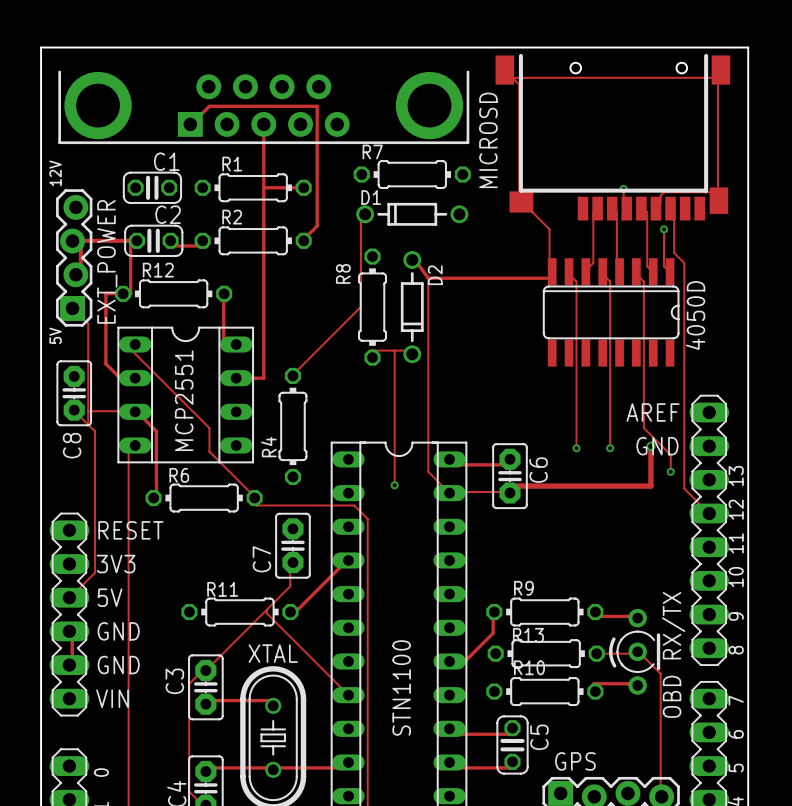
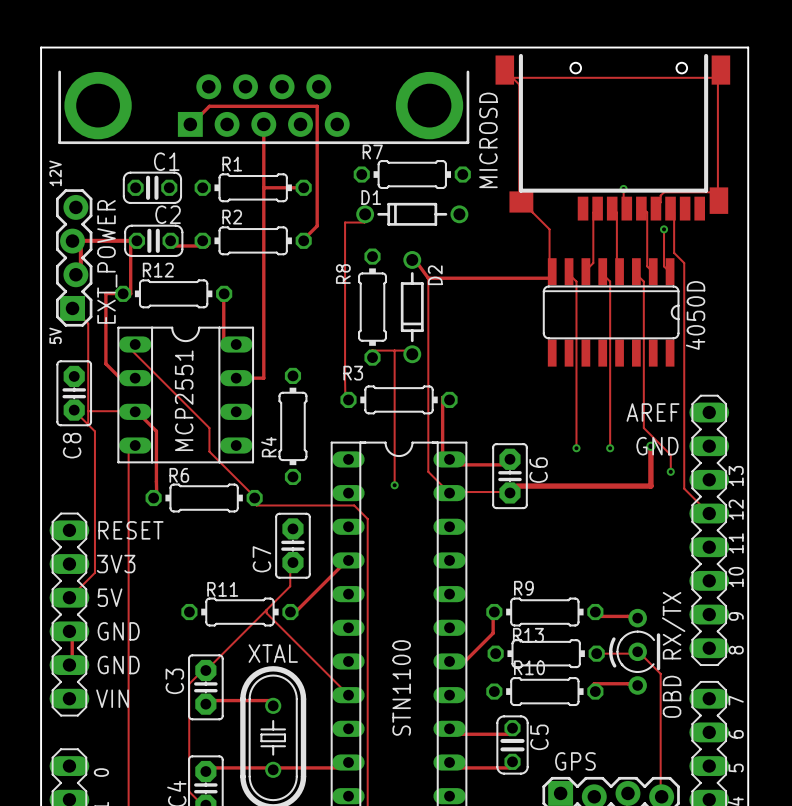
track: (365, 214) (360, 219) (360, 306) (292, 375) -> (365, 214) (364, 222) (345, 222) (345, 401) (348, 399)
R3: none -> (399, 399)
track: none -> (449, 399) (442, 397) (442, 464) (449, 459)

